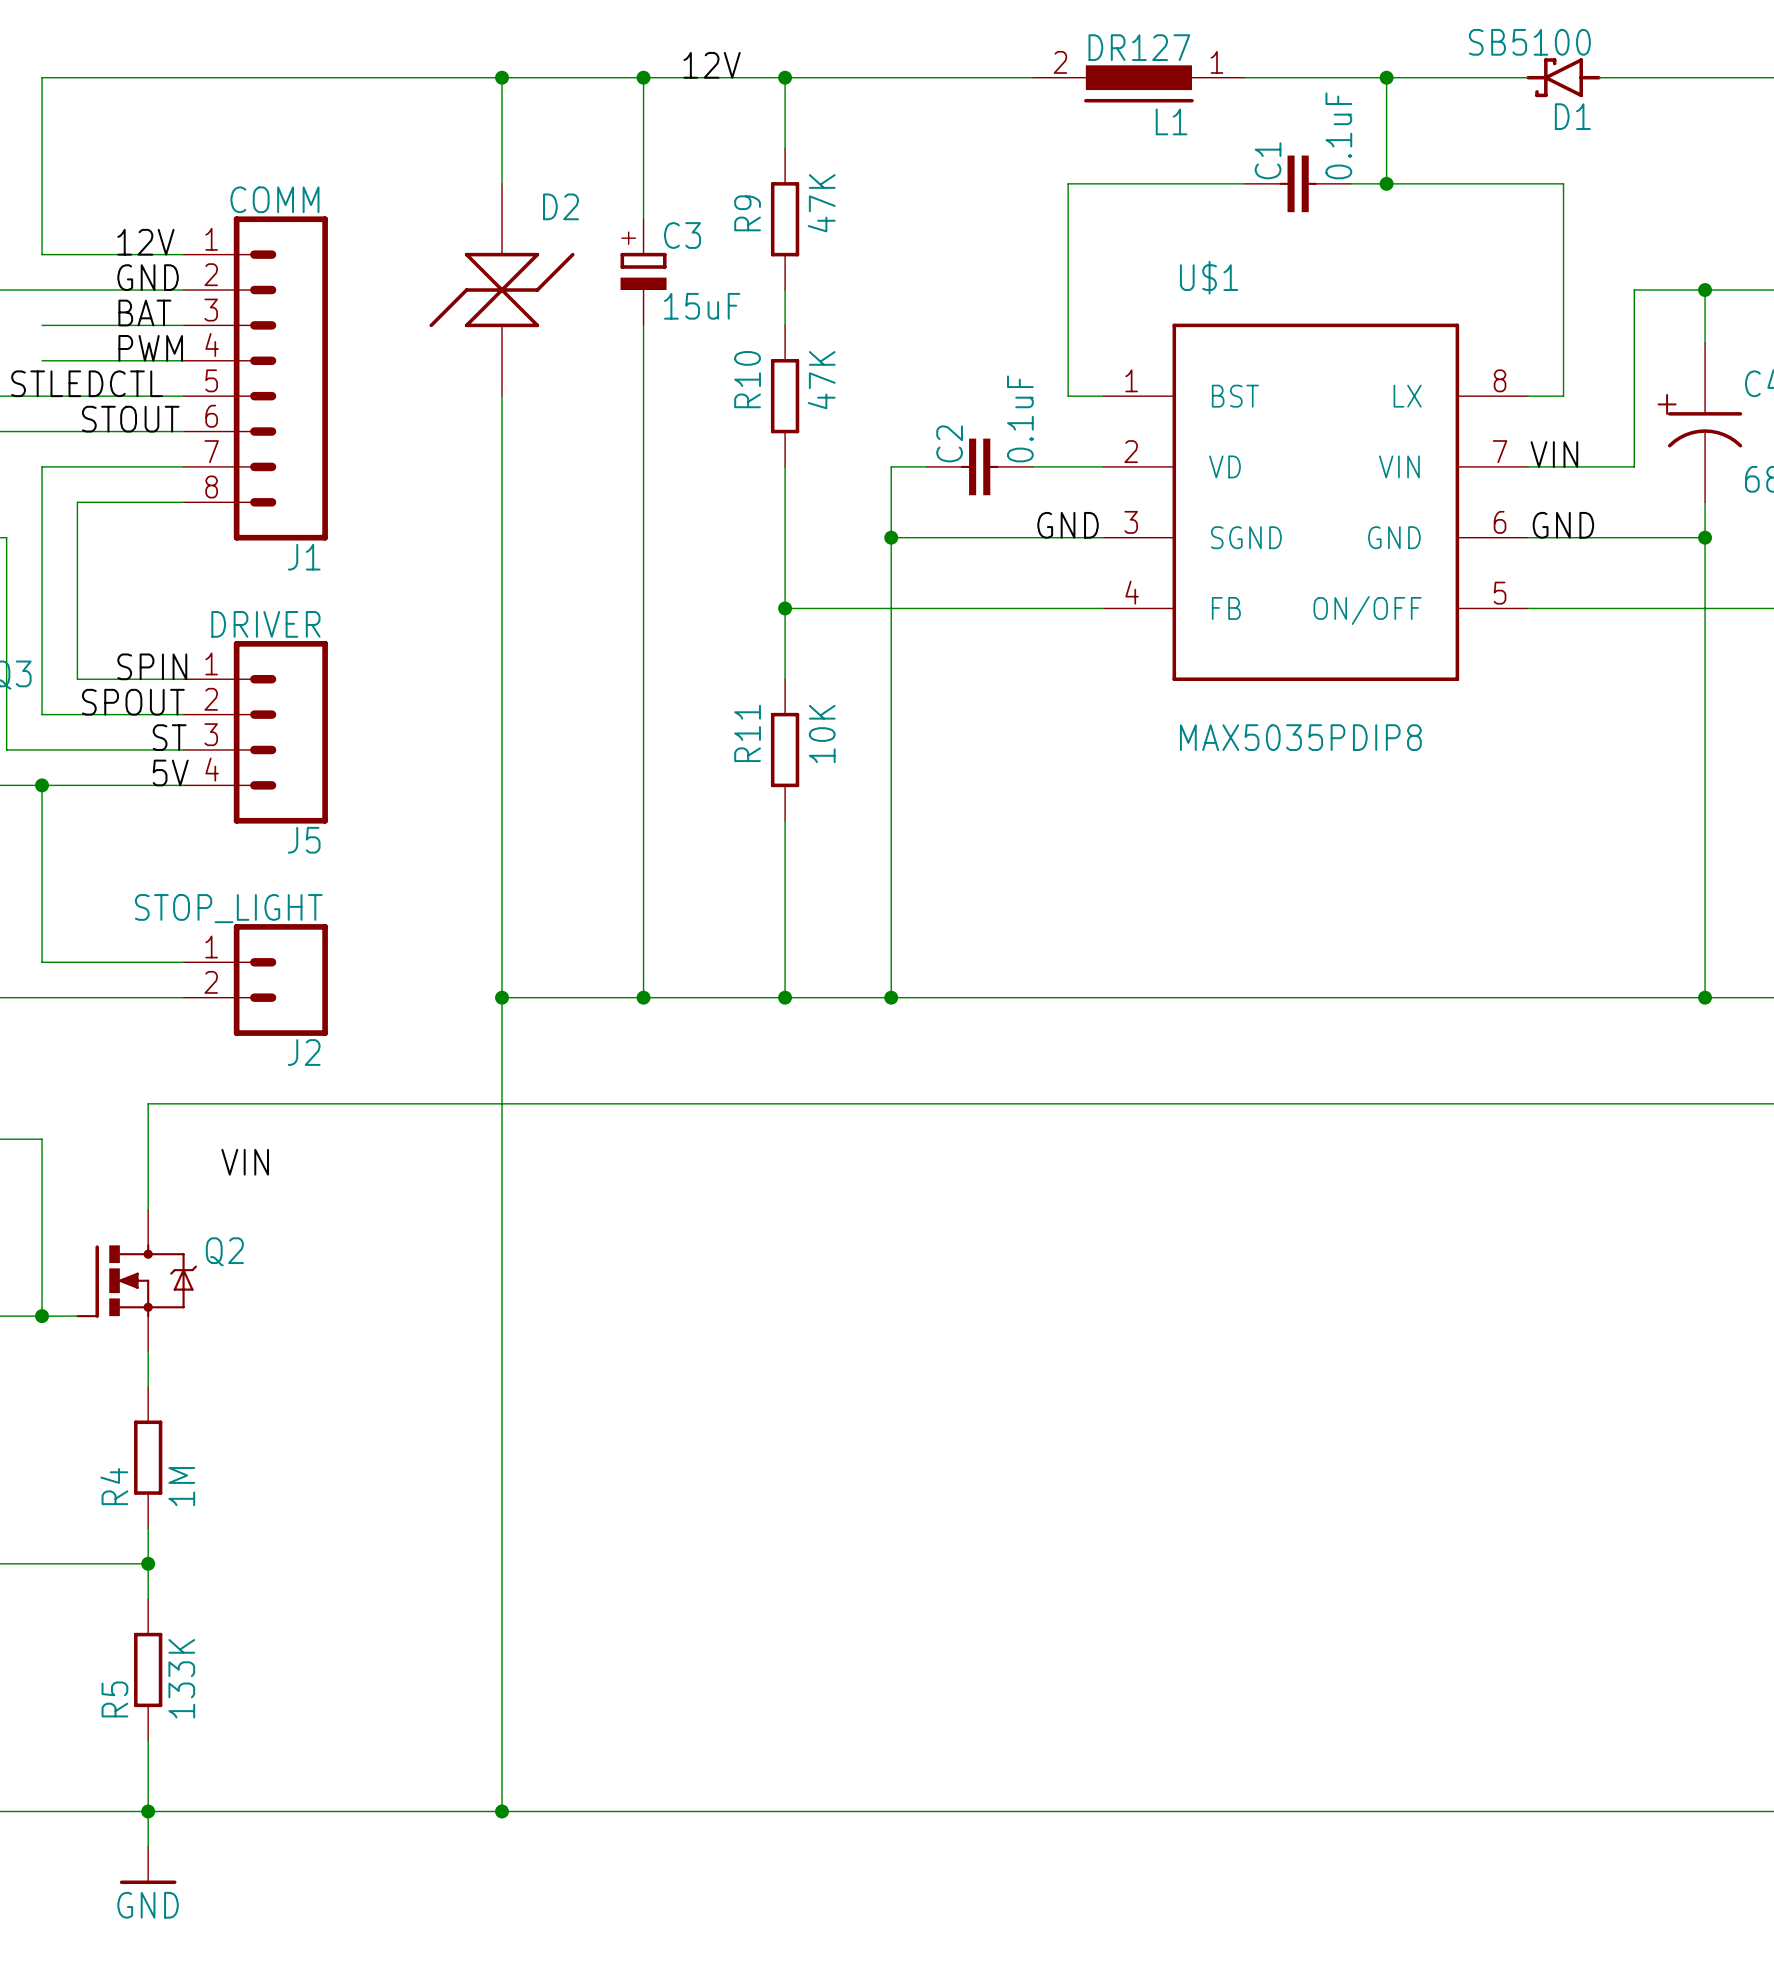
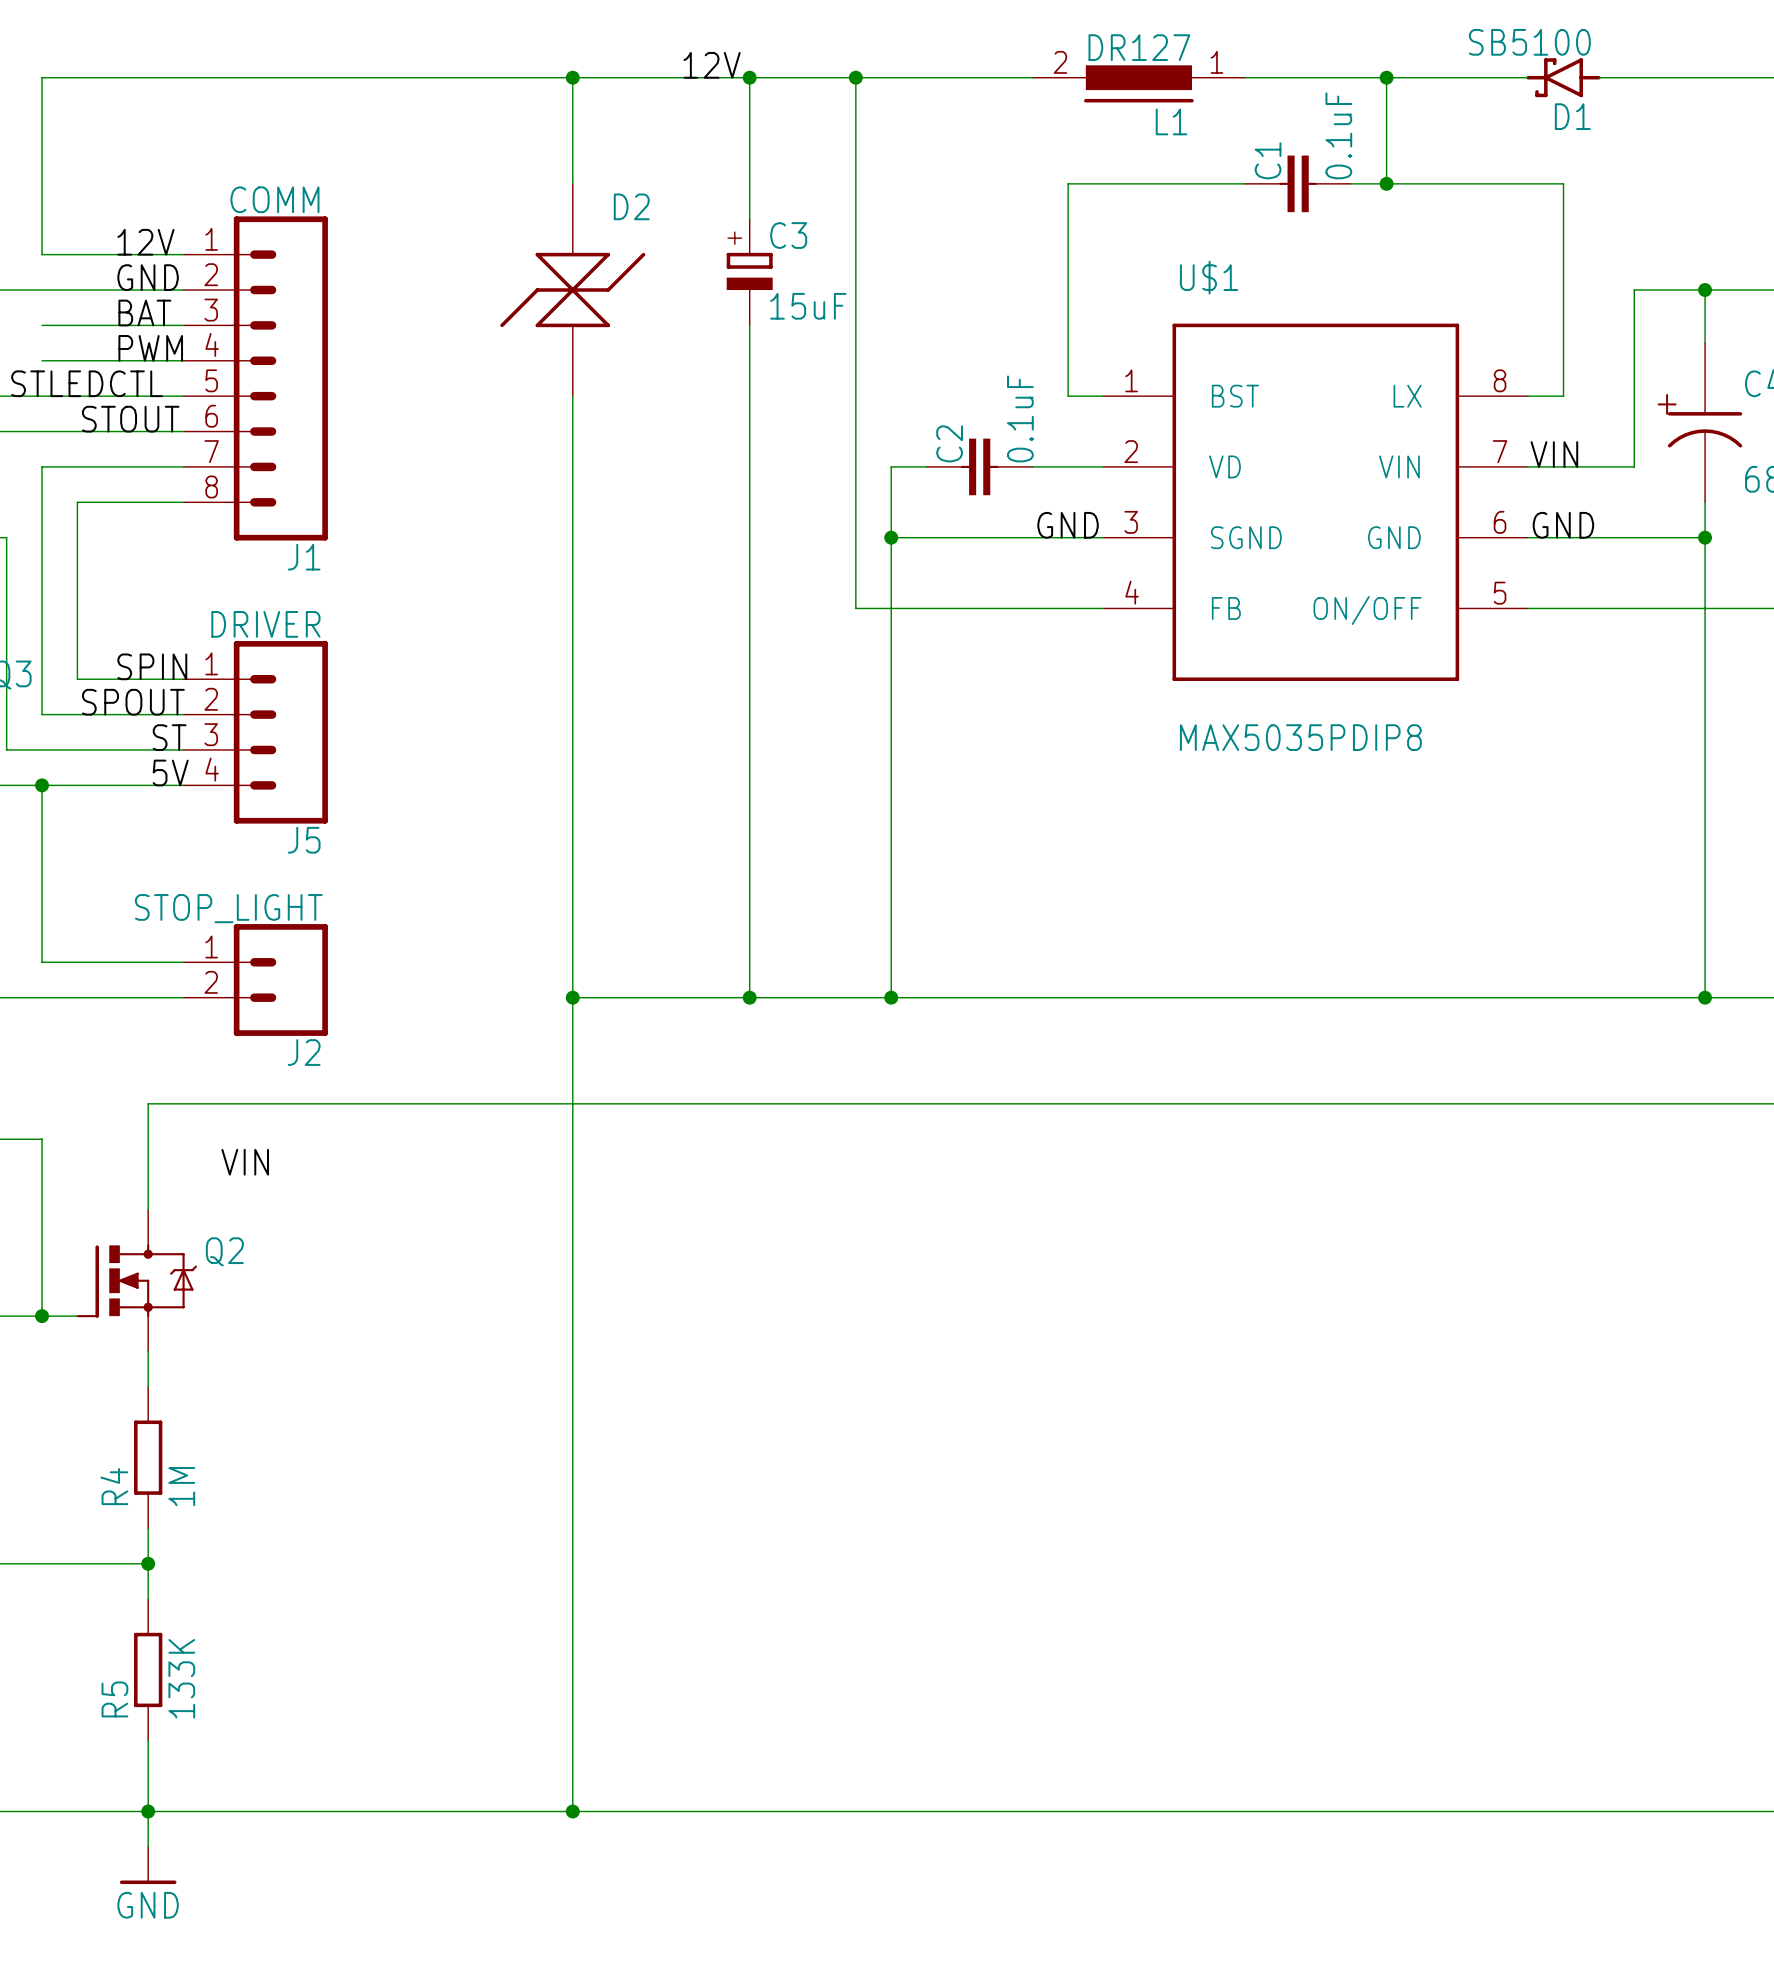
wire: (502, 77) (502, 183) -> (572, 77) (572, 183)
junction: (502, 77) -> none
junction: none -> (572, 77)
wire: (643, 77) (643, 219) -> (749, 77) (749, 219)
junction: (643, 77) -> none
junction: none -> (749, 77)
wire: (785, 77) (785, 148) -> none
junction: (785, 77) -> none
junction: none -> (855, 77)
R9: 47K (785, 219) -> none
C3 position: (643, 272) -> (749, 272)
D2 position: (502, 290) -> (572, 290)
wire: (785, 290) (785, 325) -> none
wire: (643, 325) (643, 997) -> (749, 325) (749, 997)
wire: (502, 396) (502, 1811) -> (572, 396) (572, 1811)
R10: 47K (785, 396) -> none
wire: (785, 466) (785, 679) -> none
wire: (785, 608) (855, 608) -> (855, 77) (855, 608)
junction: (785, 608) -> none
R11: 10K (785, 749) -> none
wire: (785, 820) (785, 997) -> none
wire: (502, 997) (572, 997) -> none
junction: (502, 997) -> none
junction: none -> (572, 997)
junction: (643, 997) -> none
junction position: (785, 997) -> (749, 997)
junction position: (502, 1811) -> (572, 1811)

